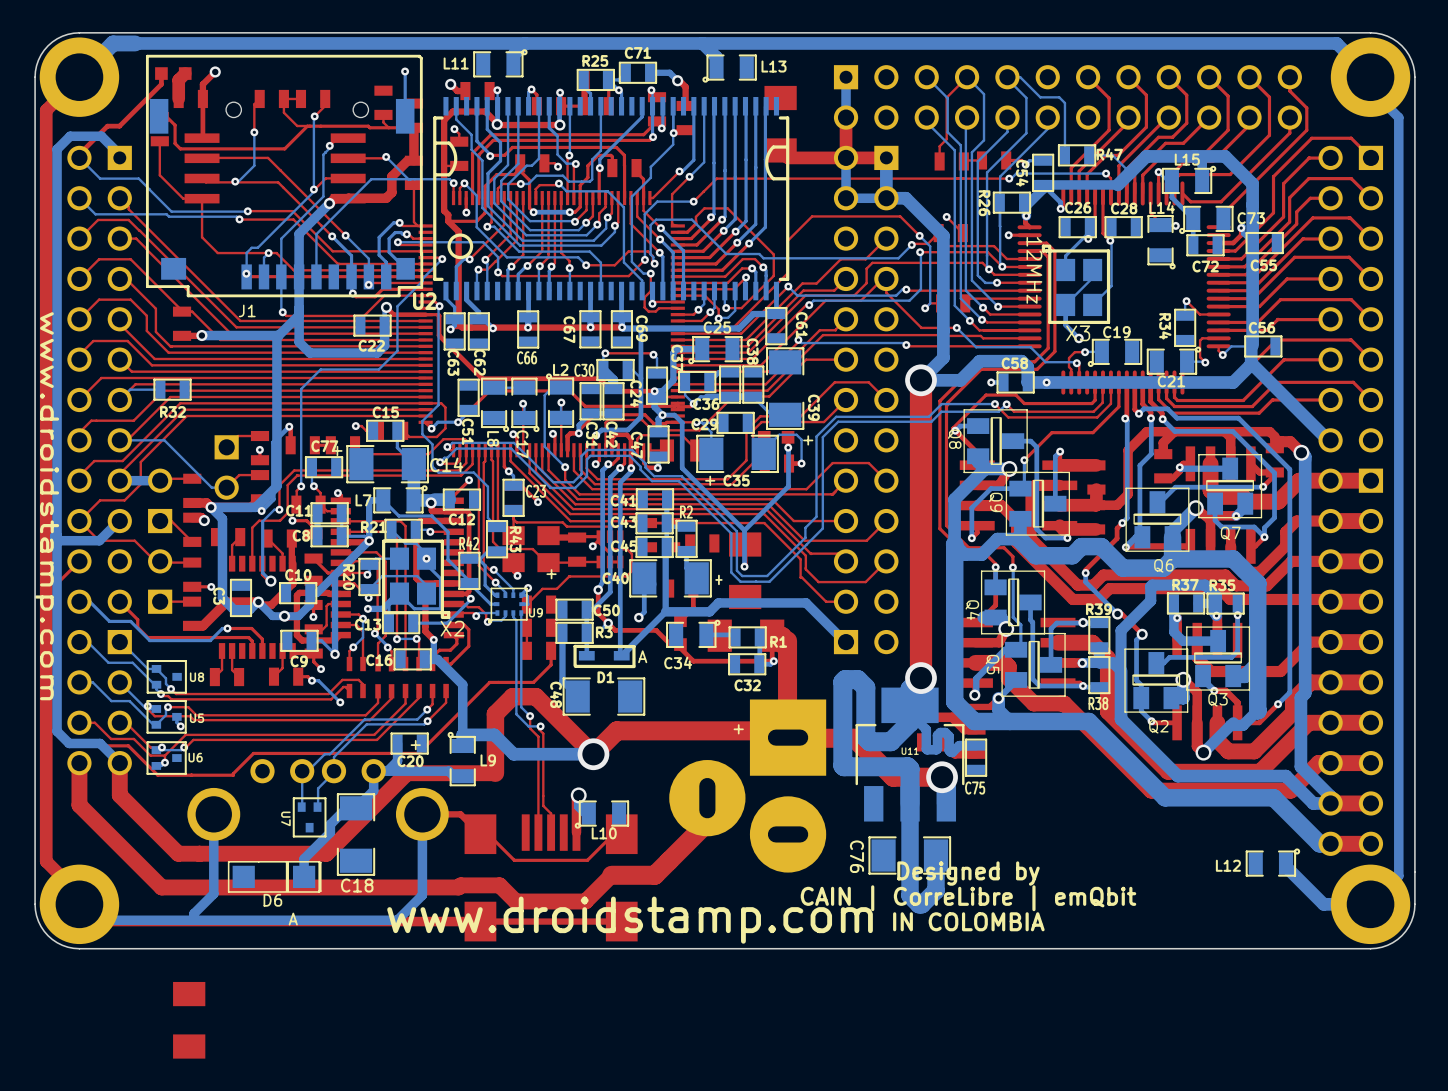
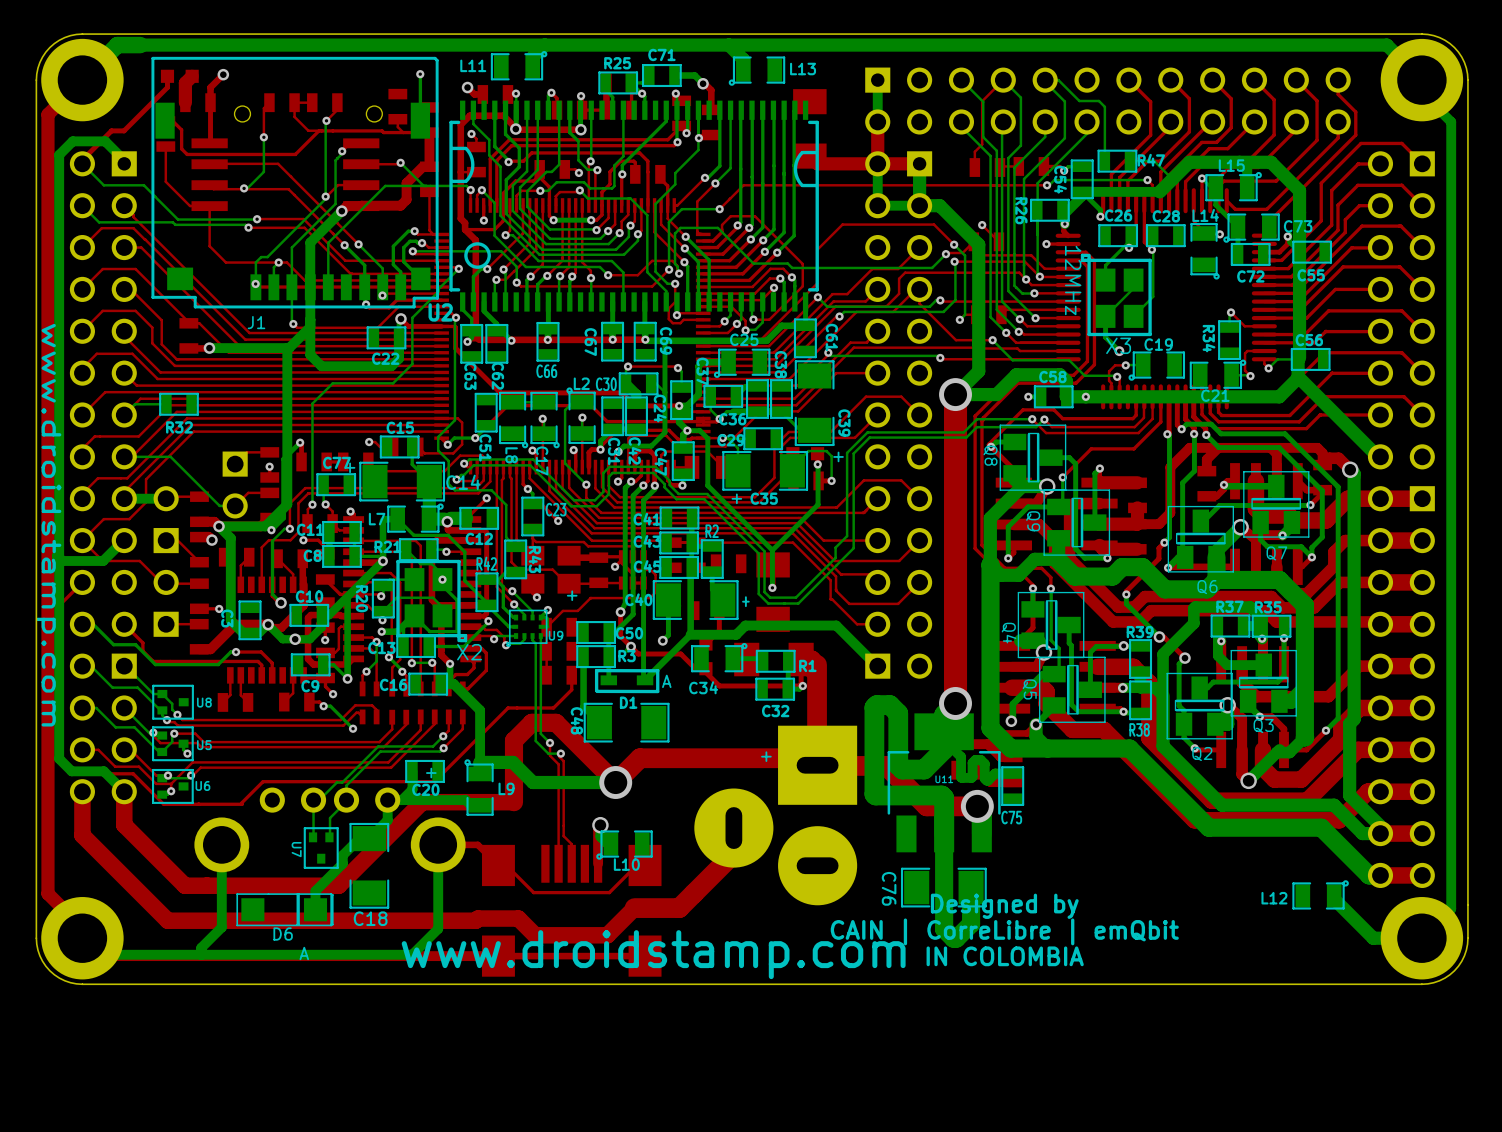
part: (189, 1020) -> none

